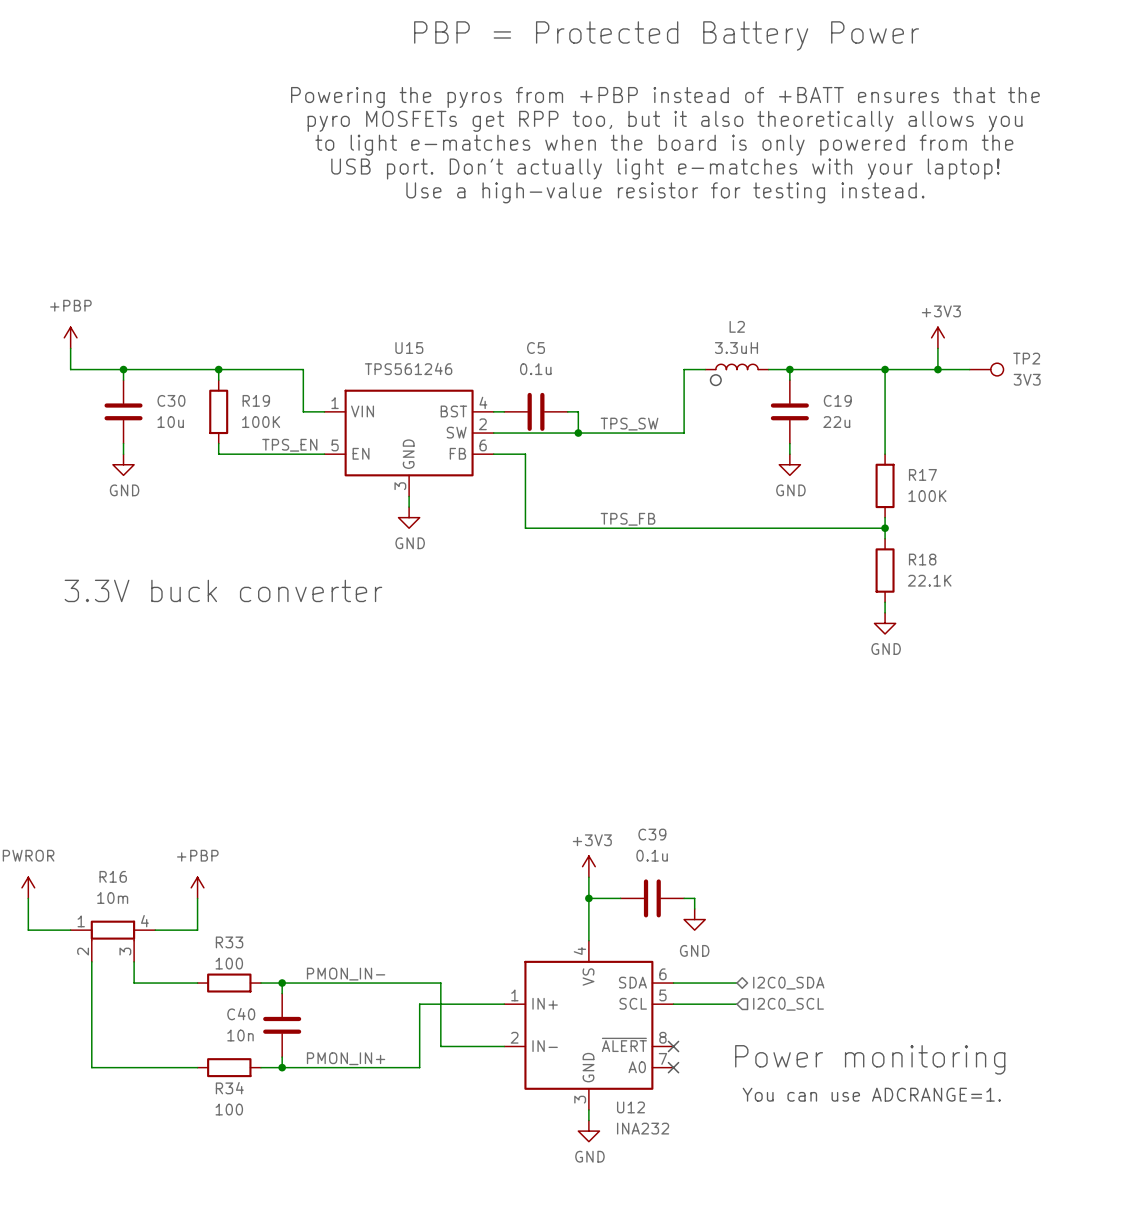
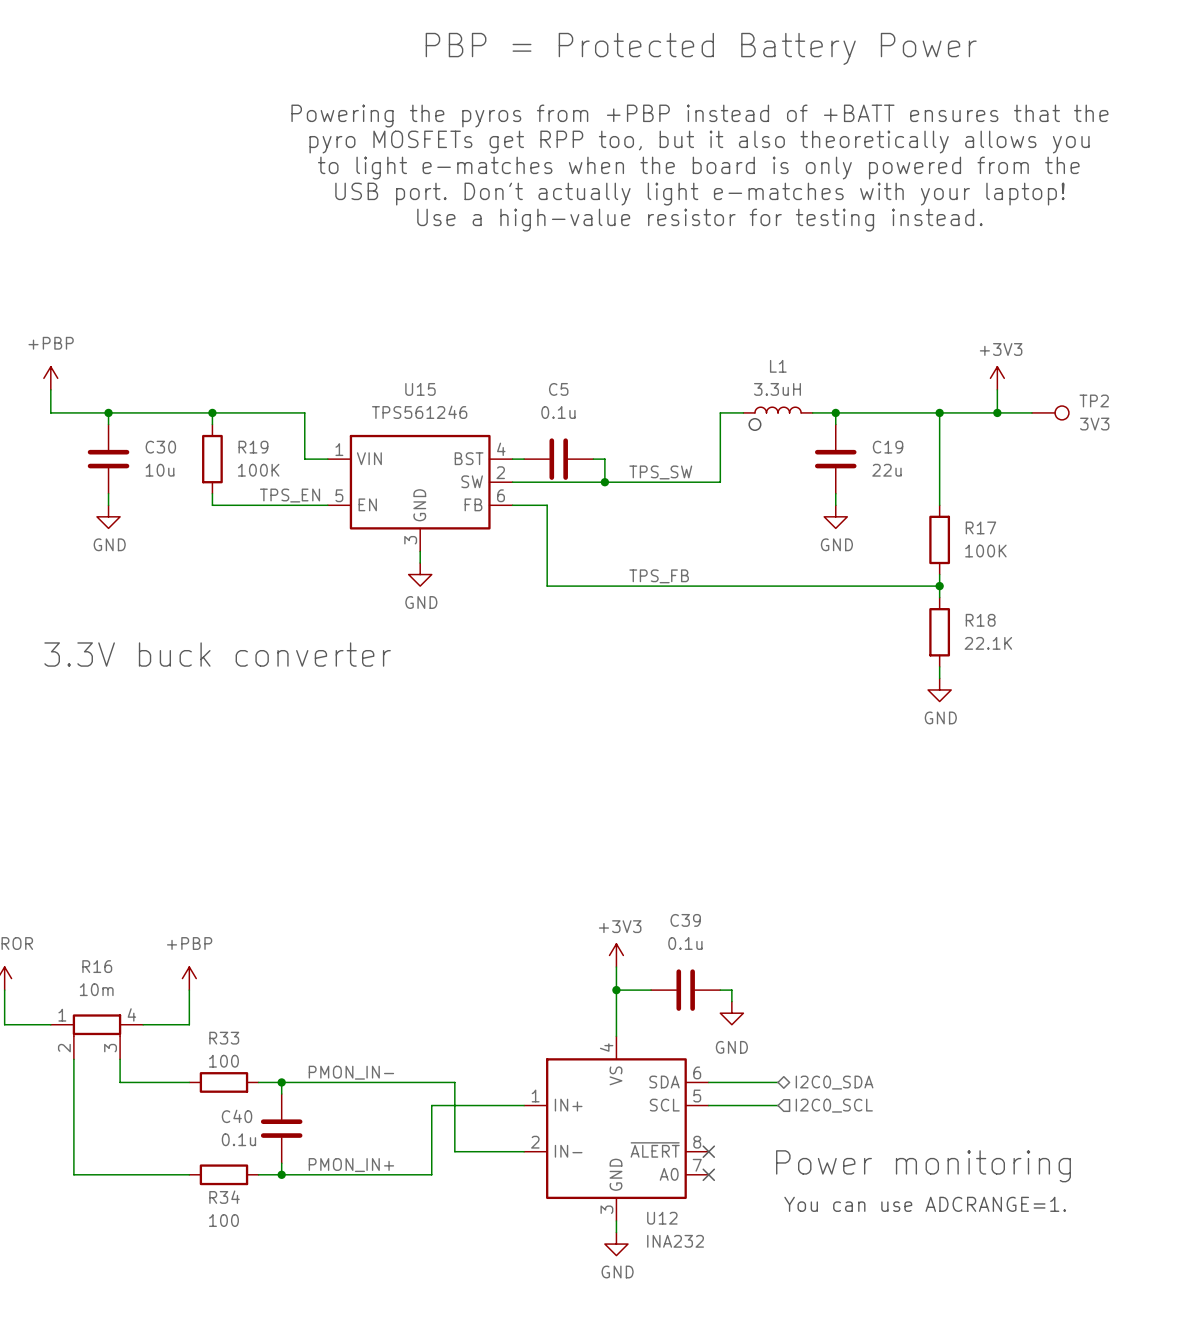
L2 name: L2 (737, 326) -> L1 (778, 366)
C40 value: 10n (240, 1035) -> 0.1u (238, 1139)

